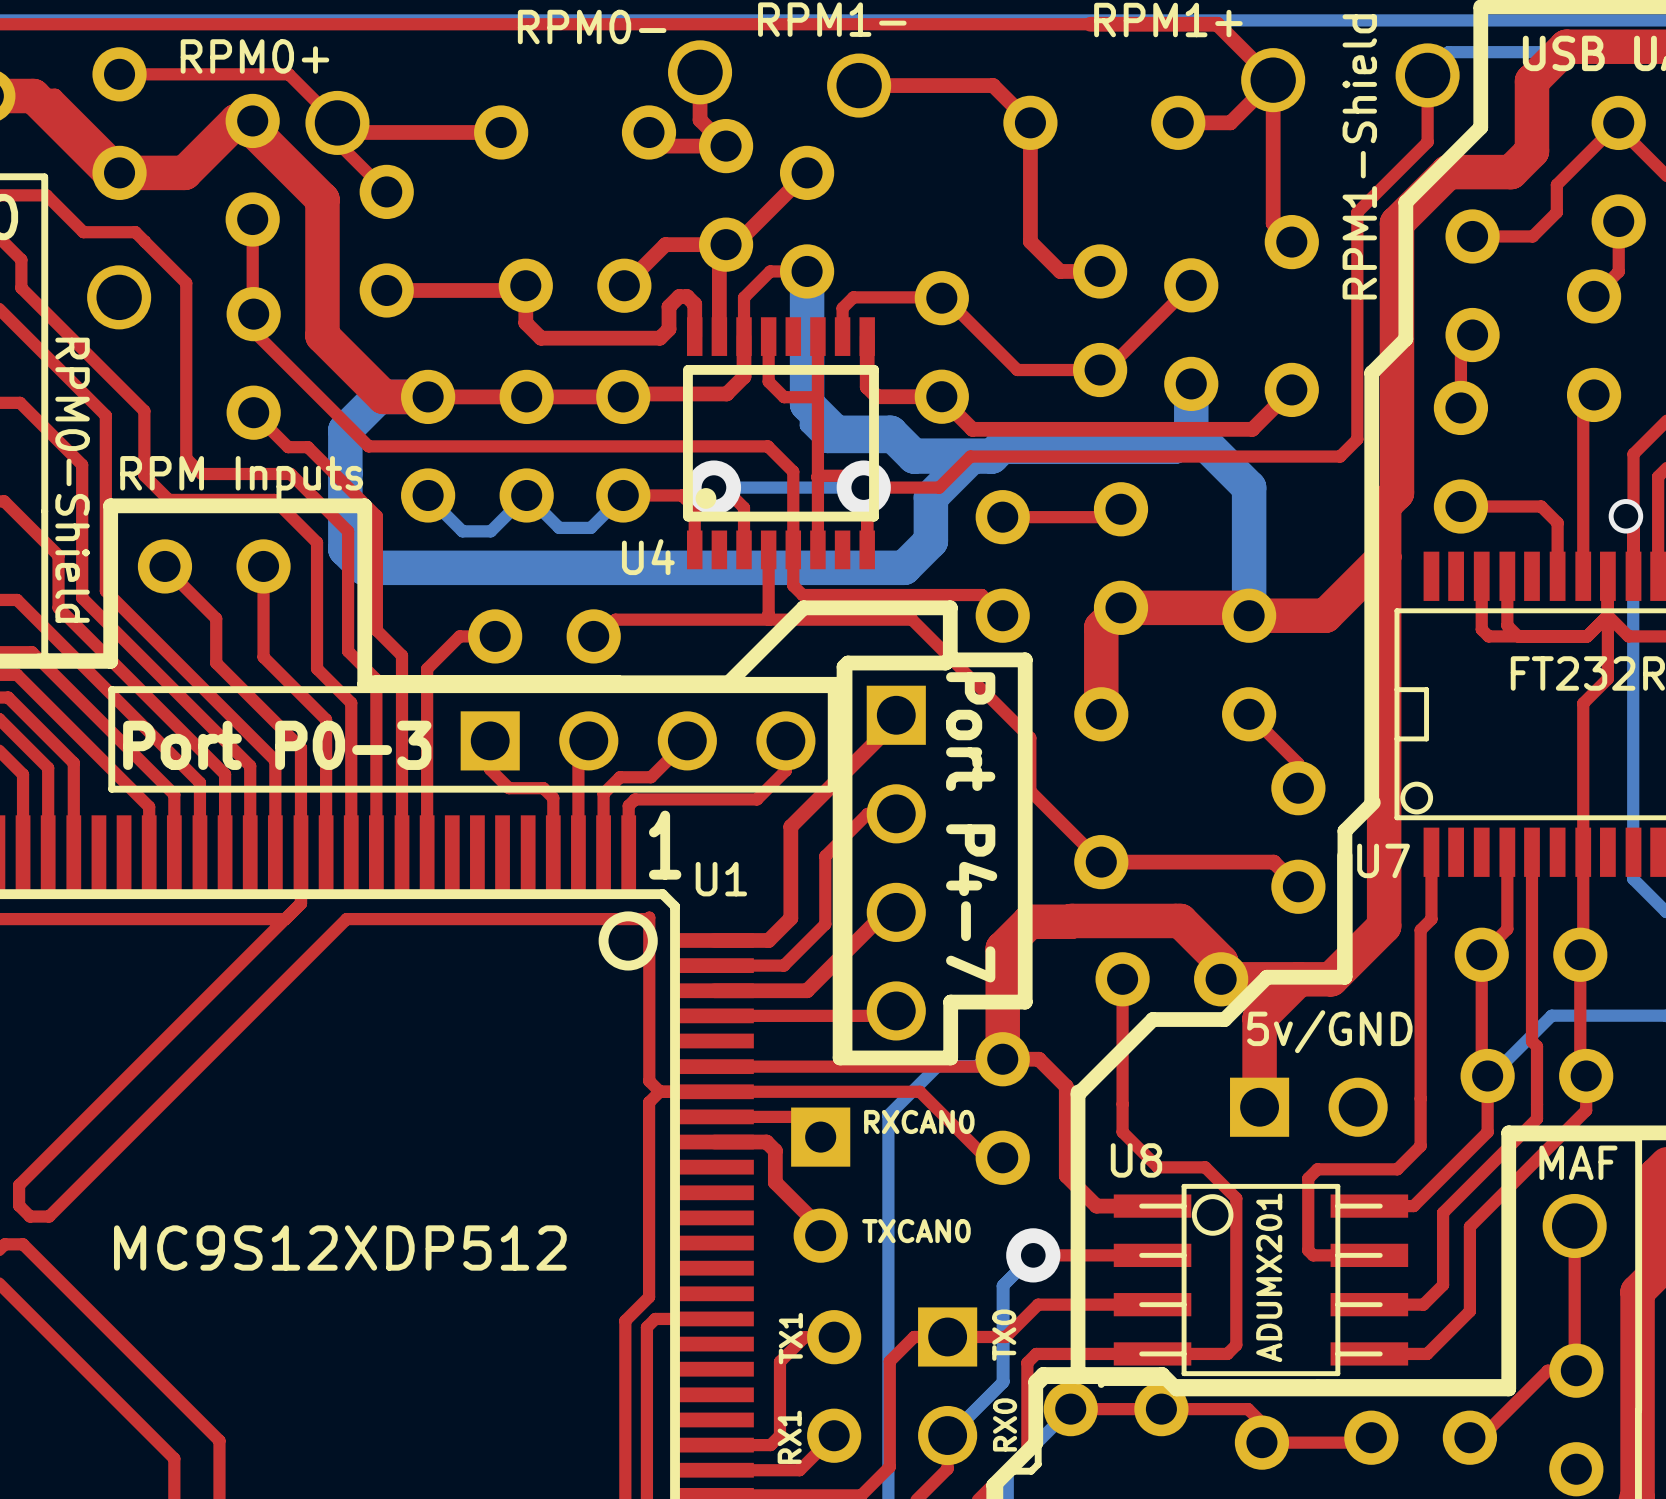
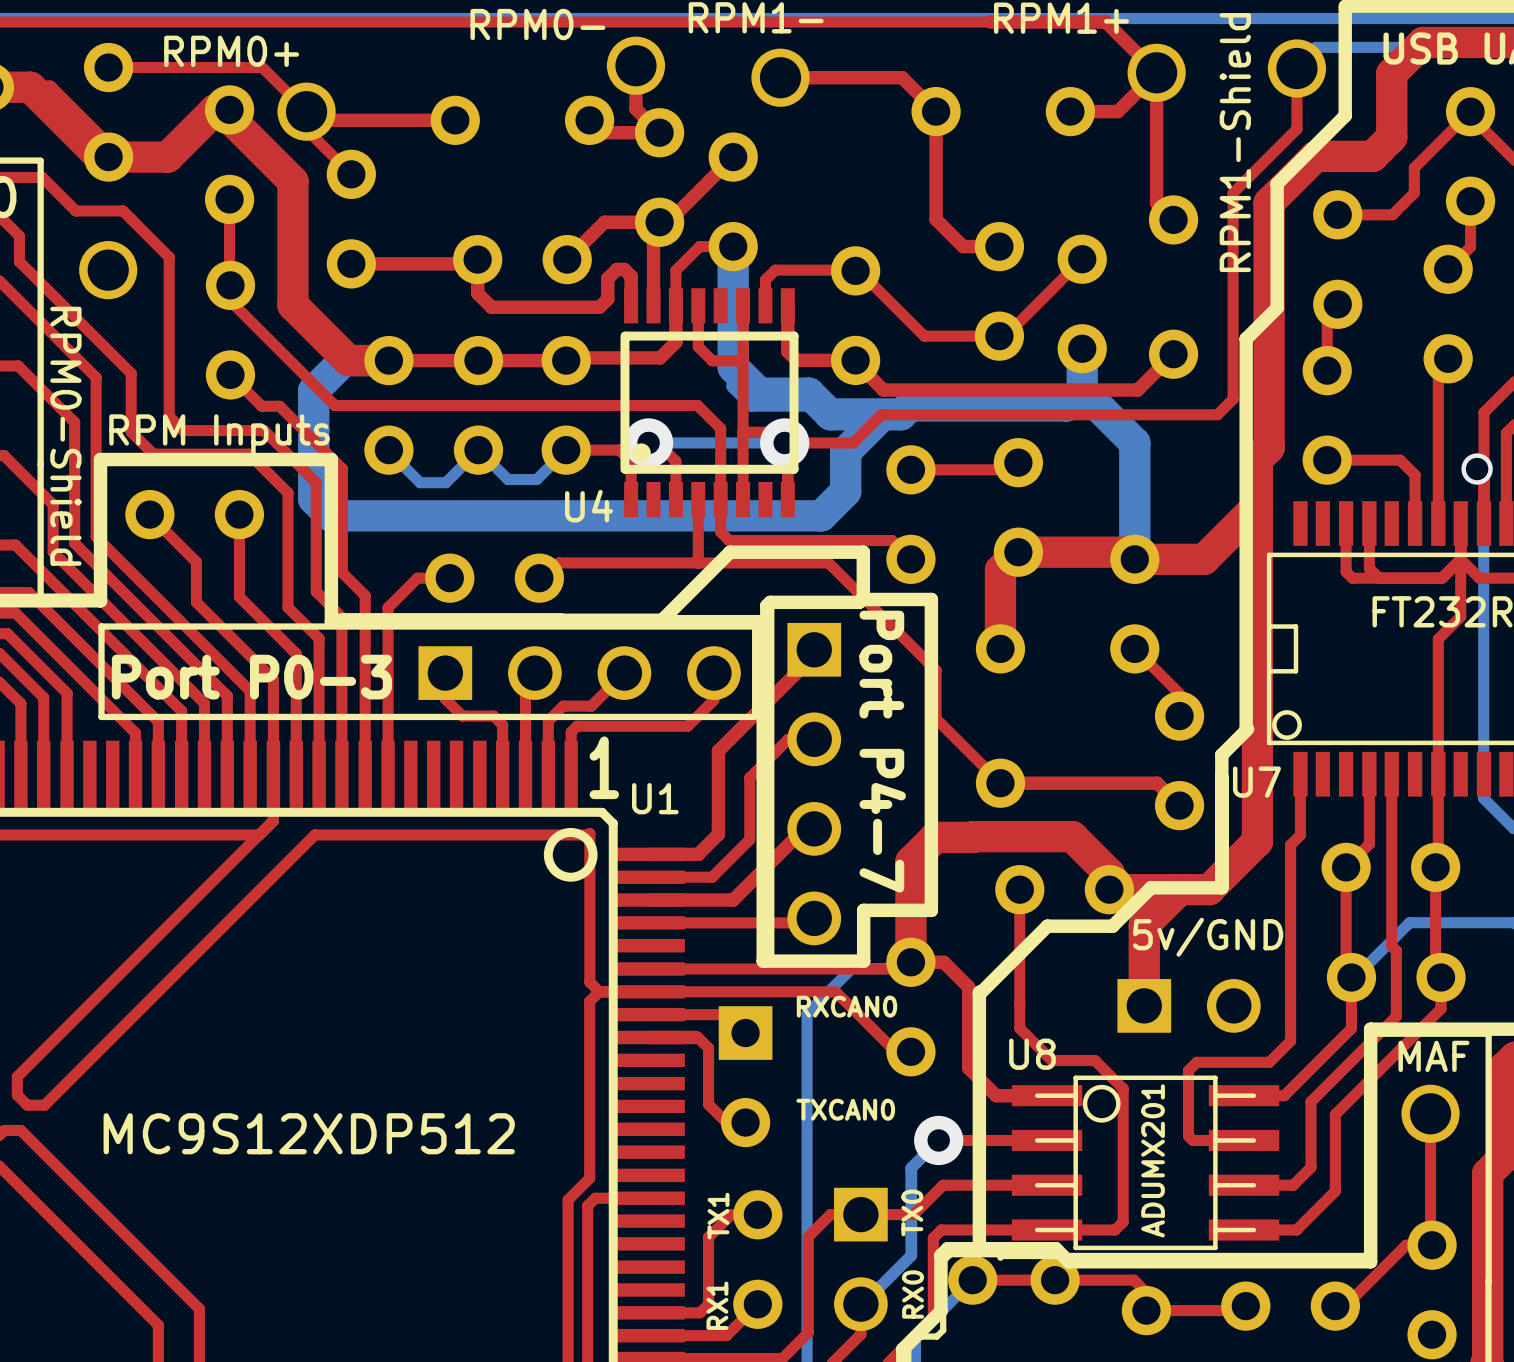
text position: RXCAN0 (919, 1121) -> RXCAN0 (847, 1006)
top track: (766, 1142) (775, 1150) (775, 1182) (820, 1227) (820, 1235) -> (696, 1037) (708, 1048) (708, 1104) (728, 1124) (756, 1124)
text position: TXCAN0 (916, 1231) -> TXCAN0 (845, 1109)

